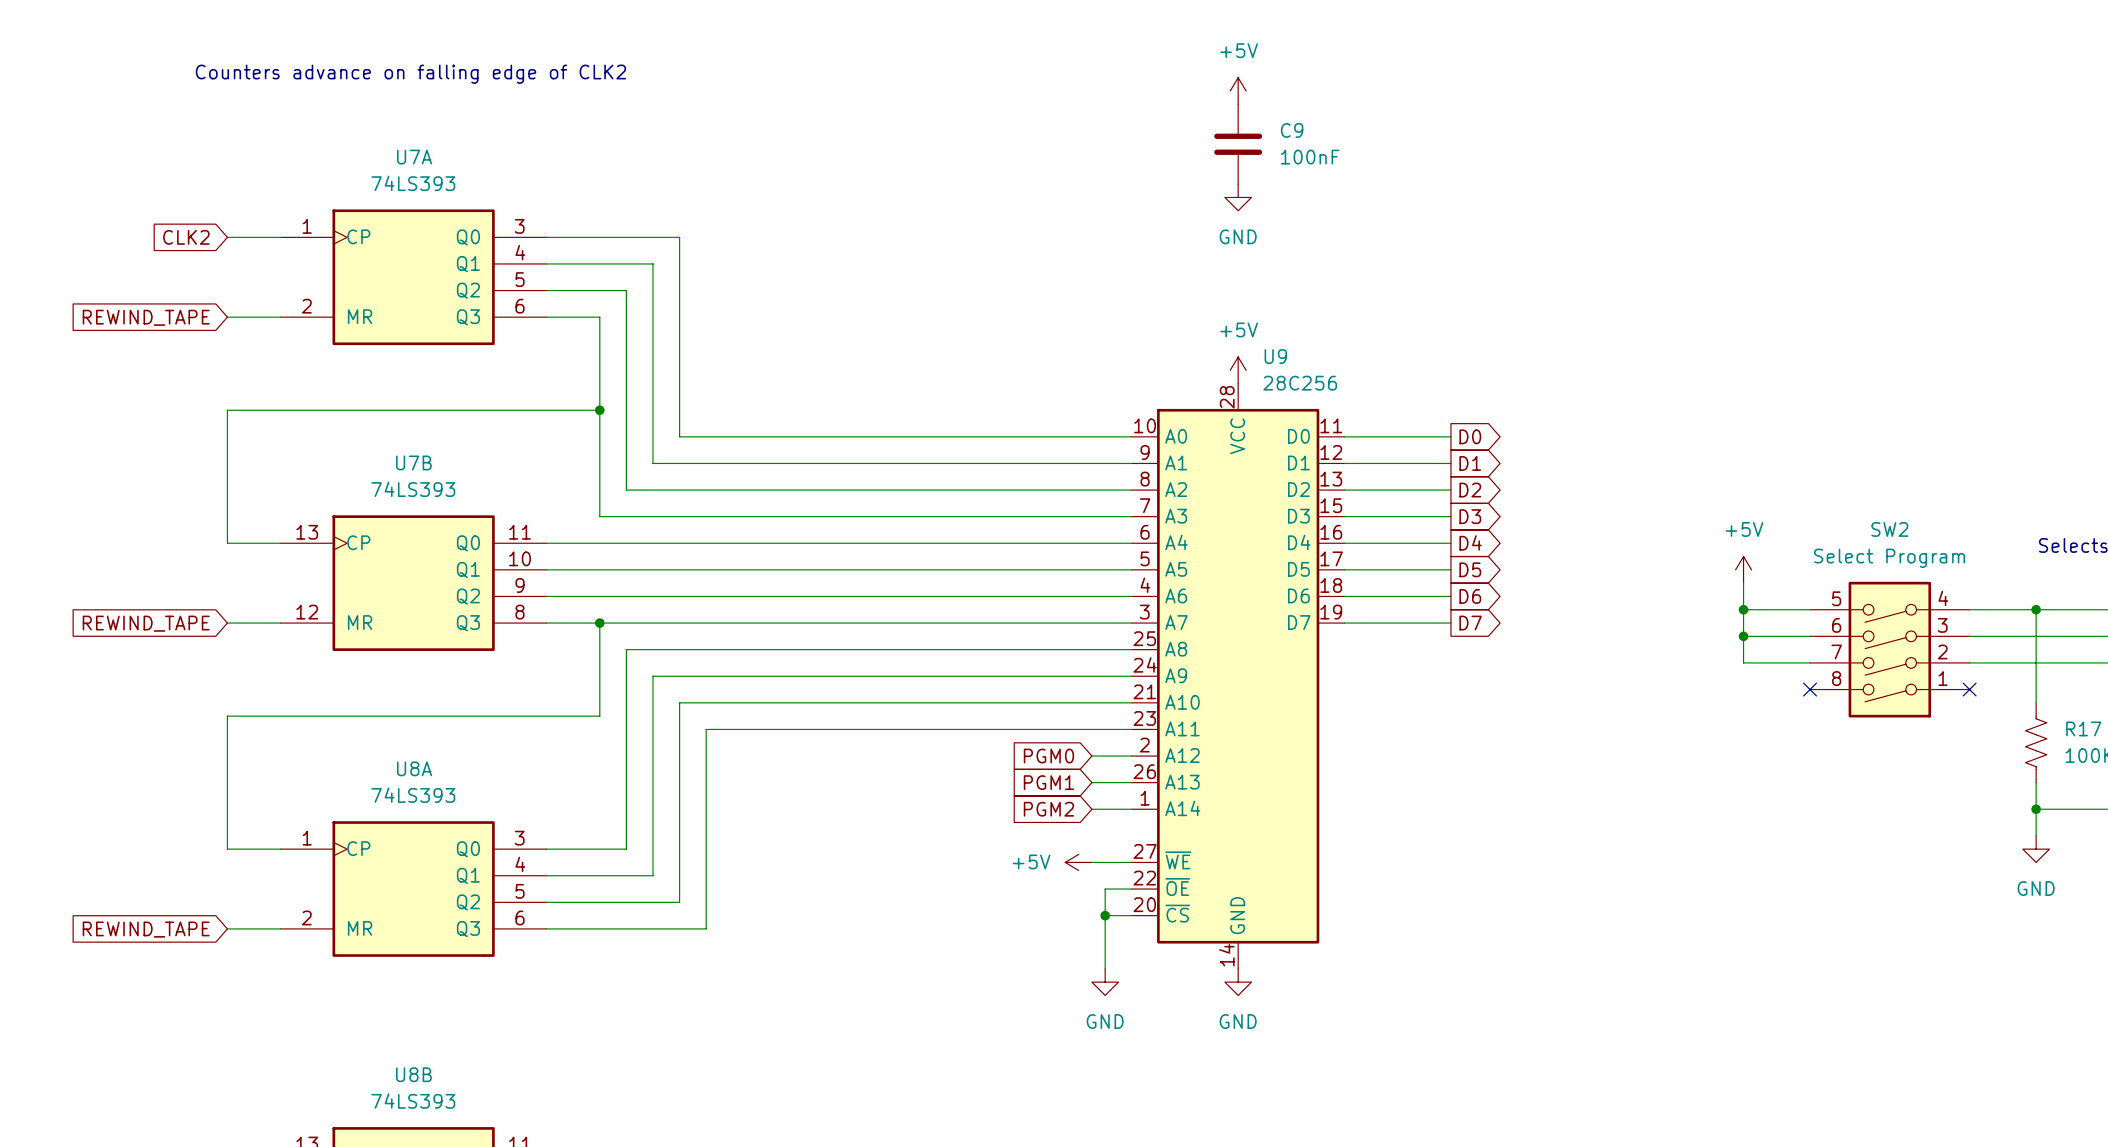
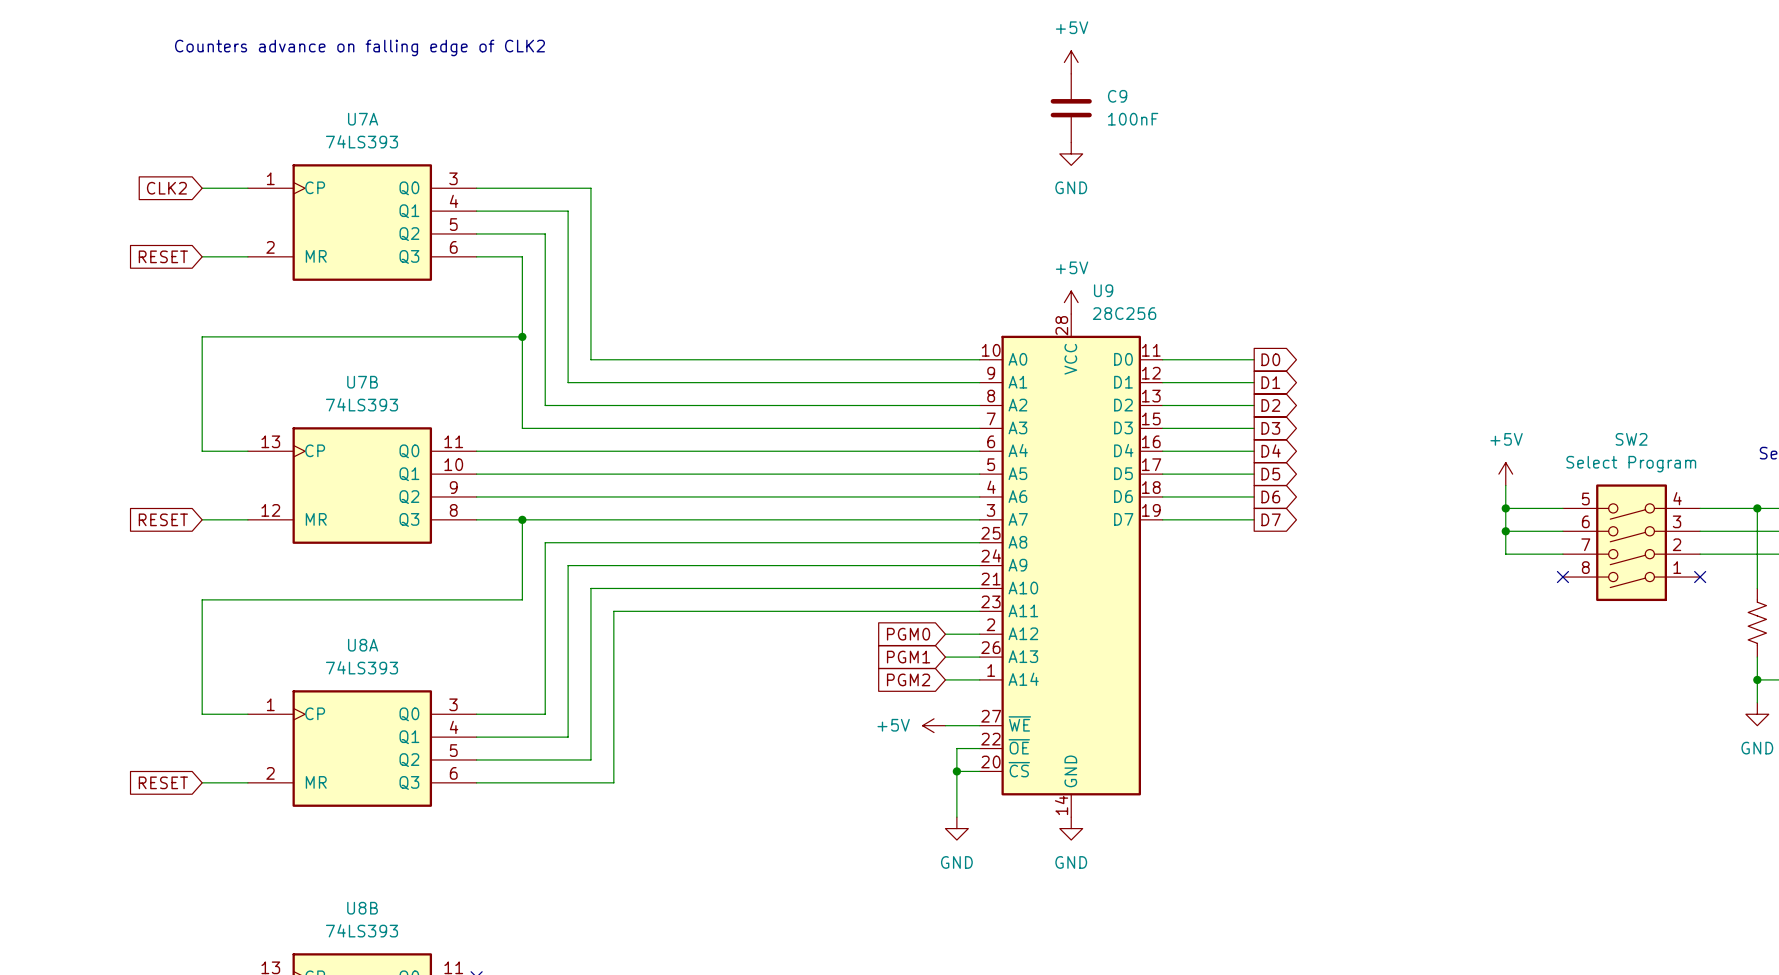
global label: REWIND_TAPE (146, 317) -> RESET (163, 256)
global label: REWIND_TAPE (146, 623) -> RESET (163, 519)
global label: REWIND_TAPE (146, 929) -> RESET (163, 782)

